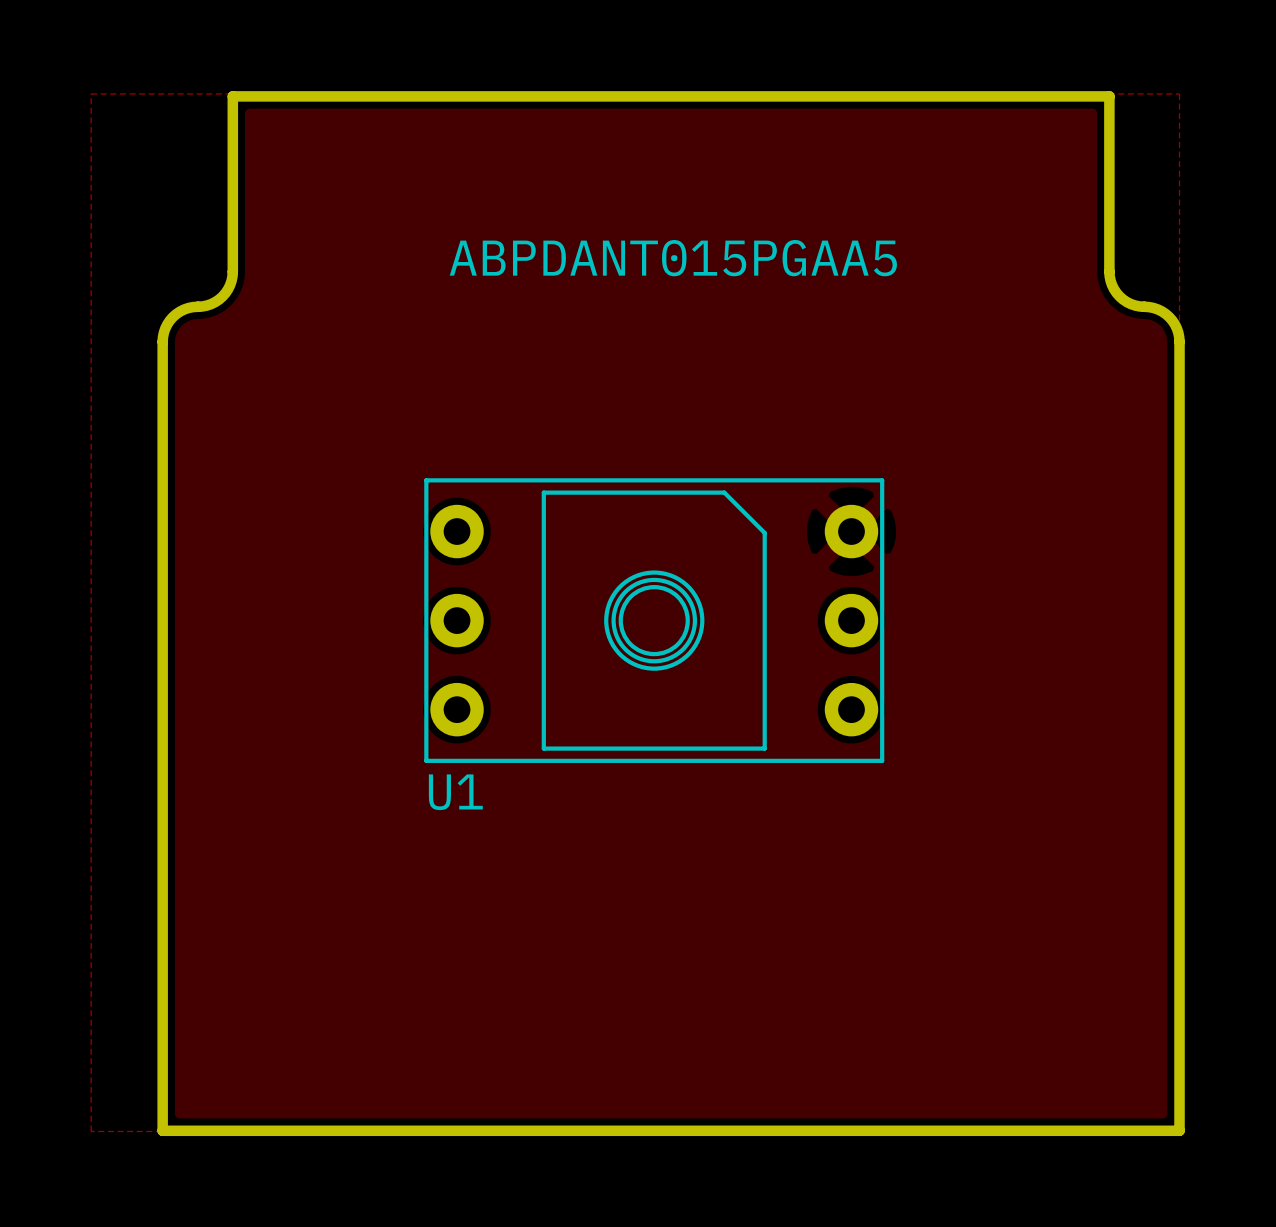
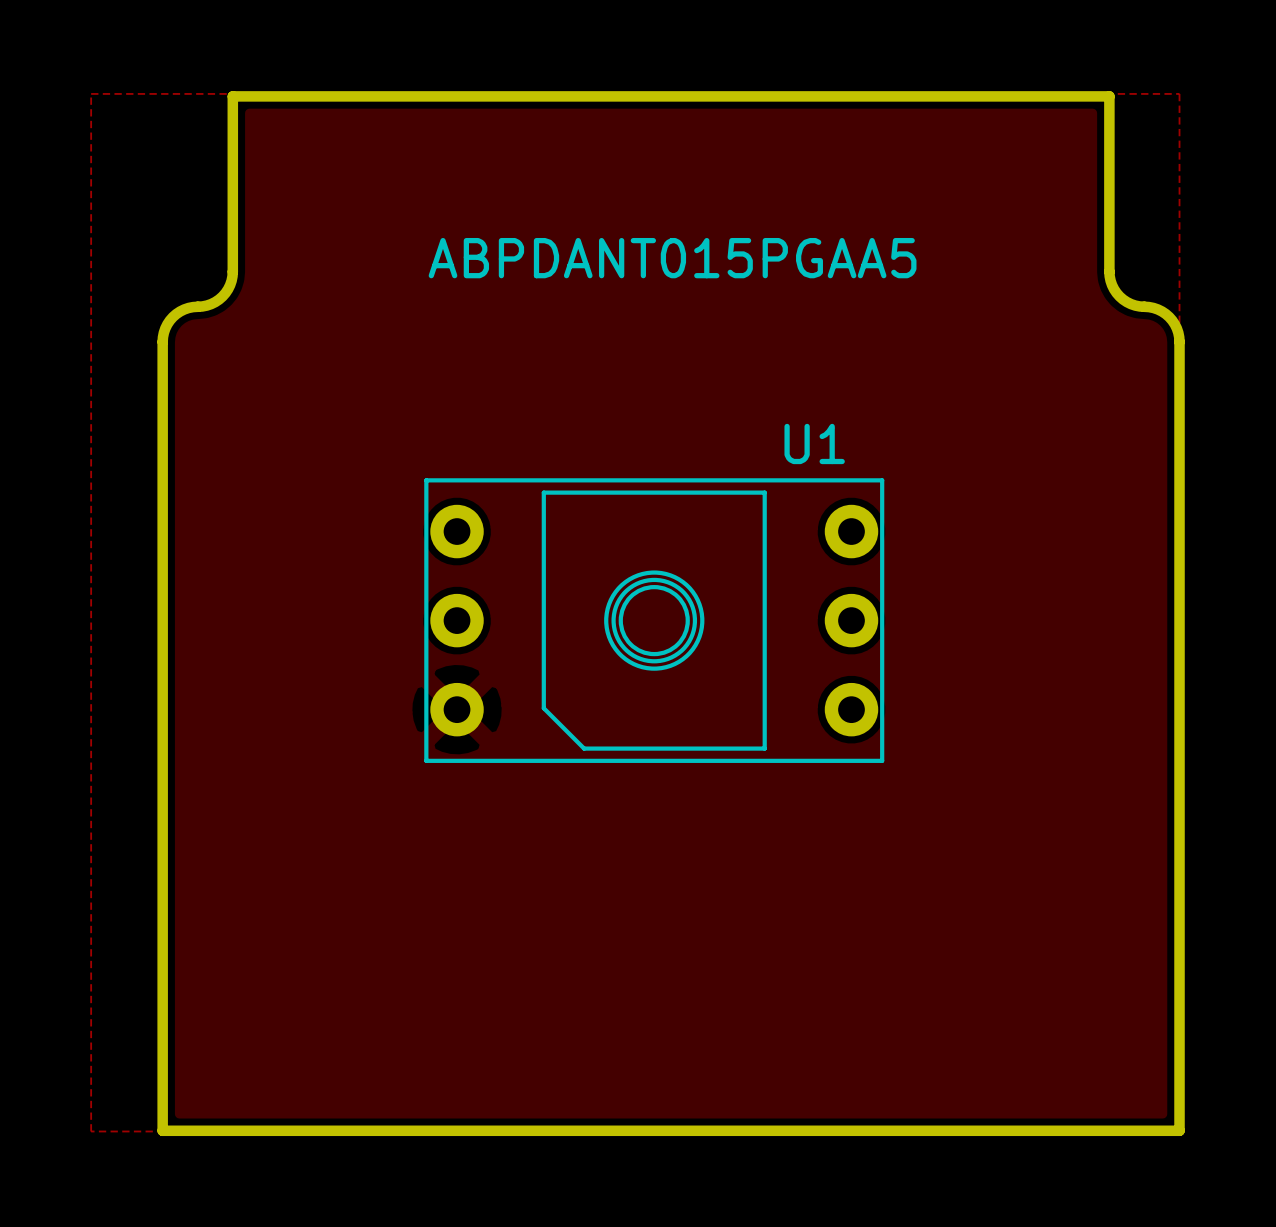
U1 rotation: 0° (654, 620) -> 180° (654, 620)

